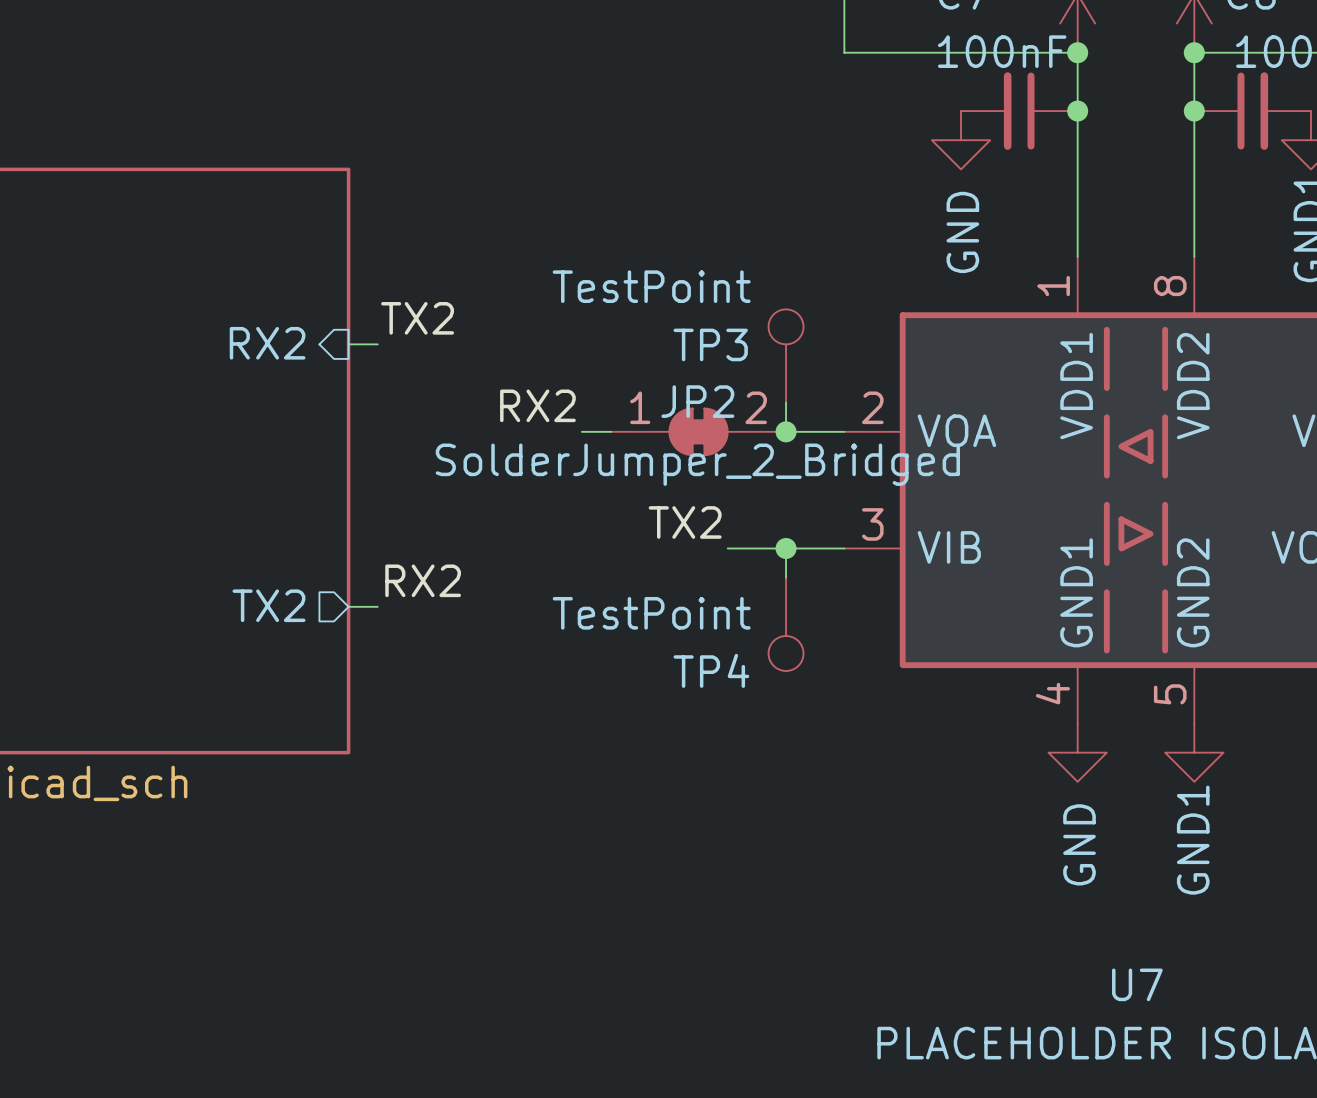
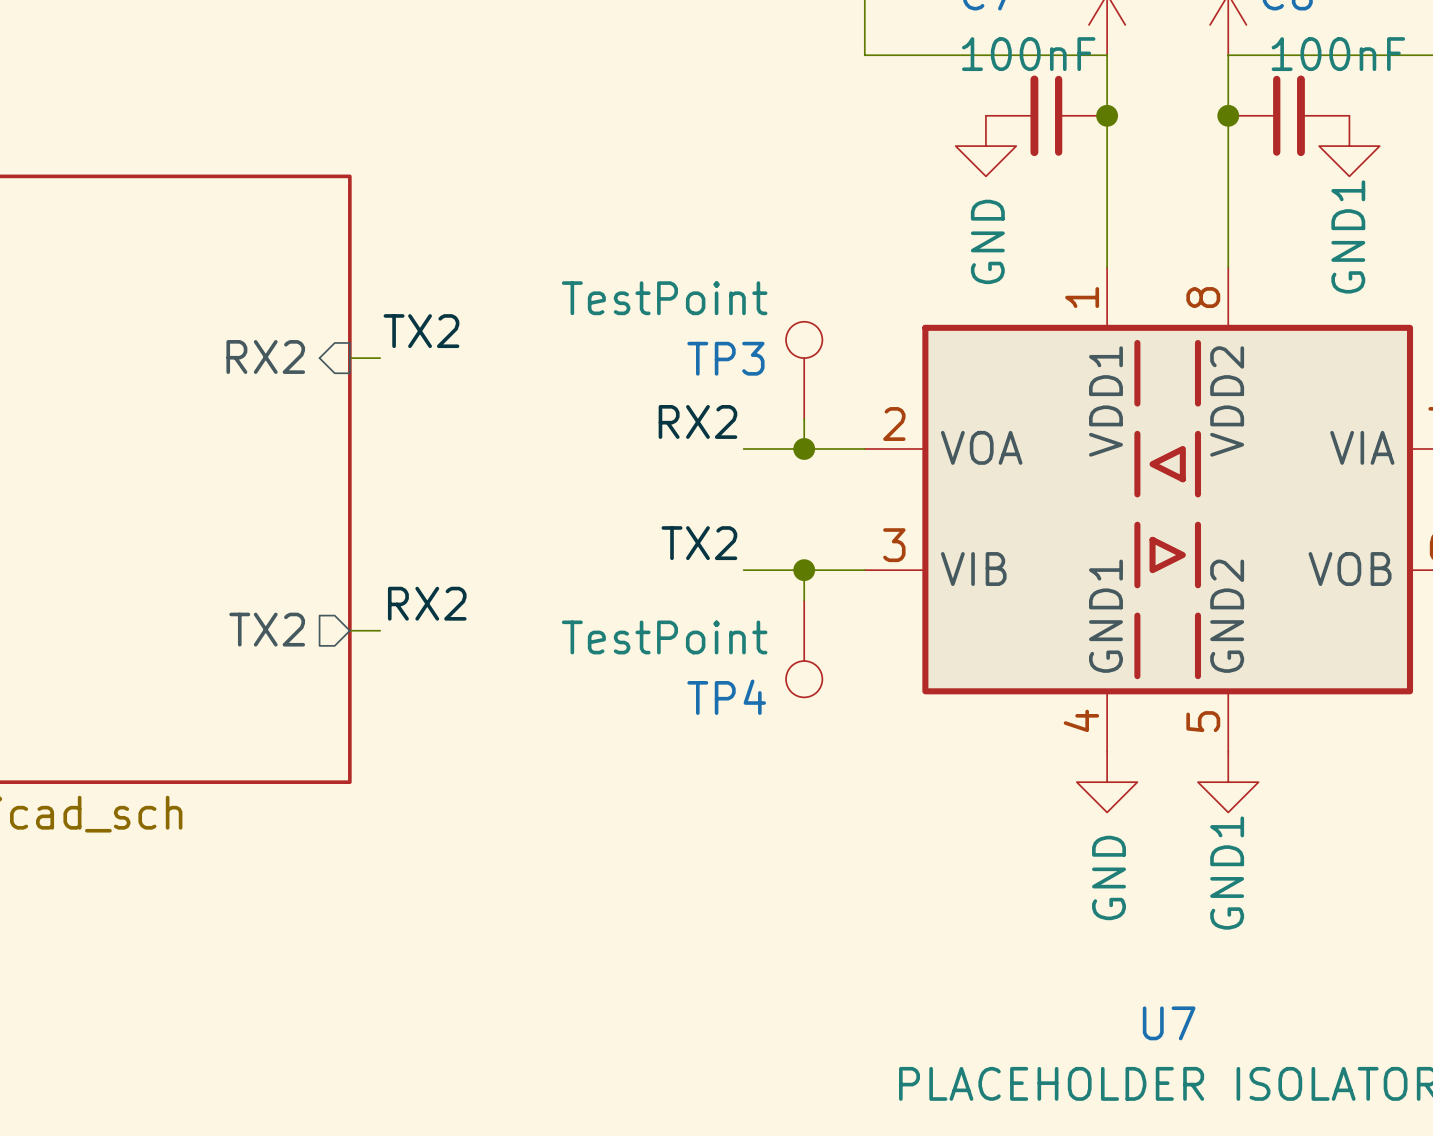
junction: (1077, 52) -> none
junction: (1194, 52) -> none
label position: RX2 (537, 405) -> RX2 (697, 421)
wire: (581, 431) (611, 431) -> none
JP2: SolderJumper_2_Bridged (698, 431) -> none

